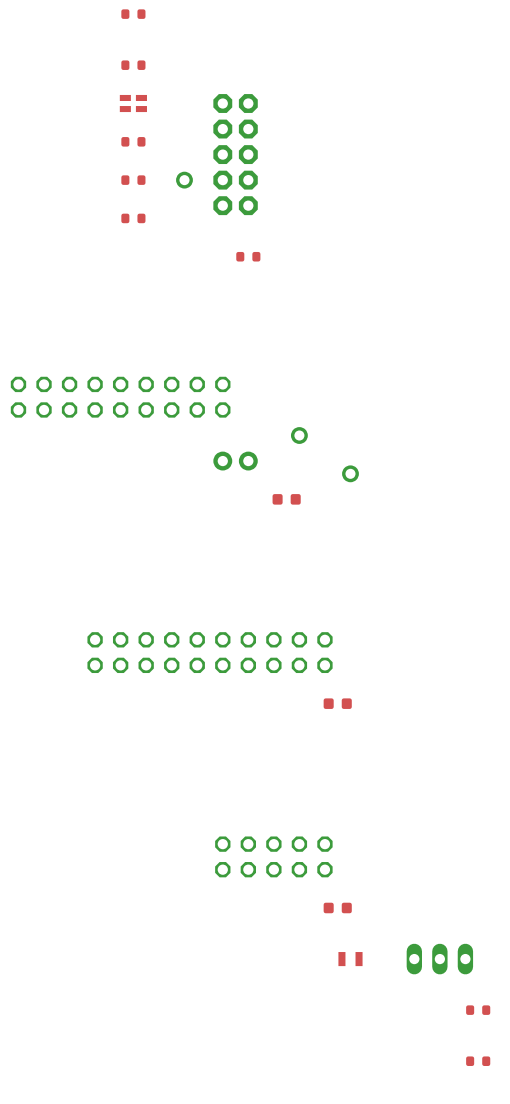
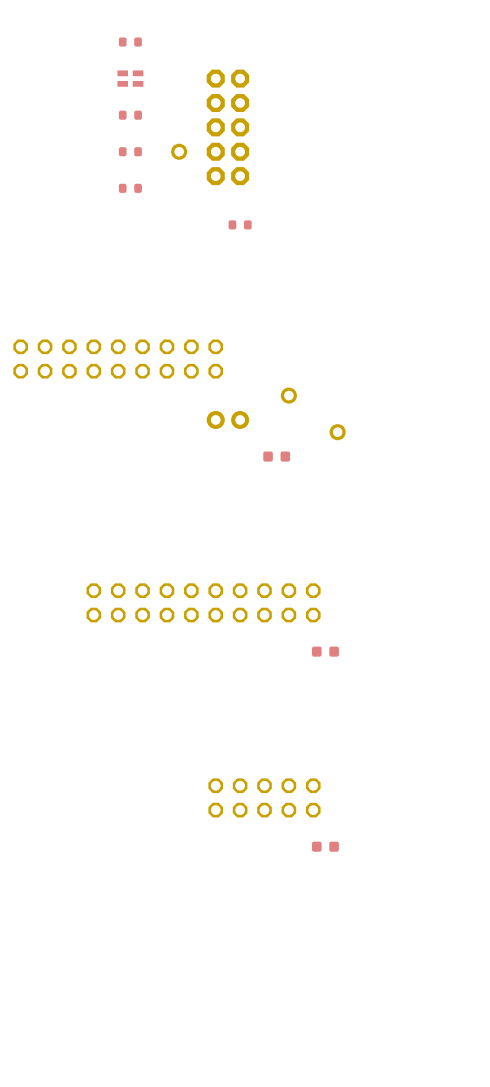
part: (350, 959) -> none
part: (439, 959) -> none
part: (478, 1010) -> none
part: (478, 1061) -> none

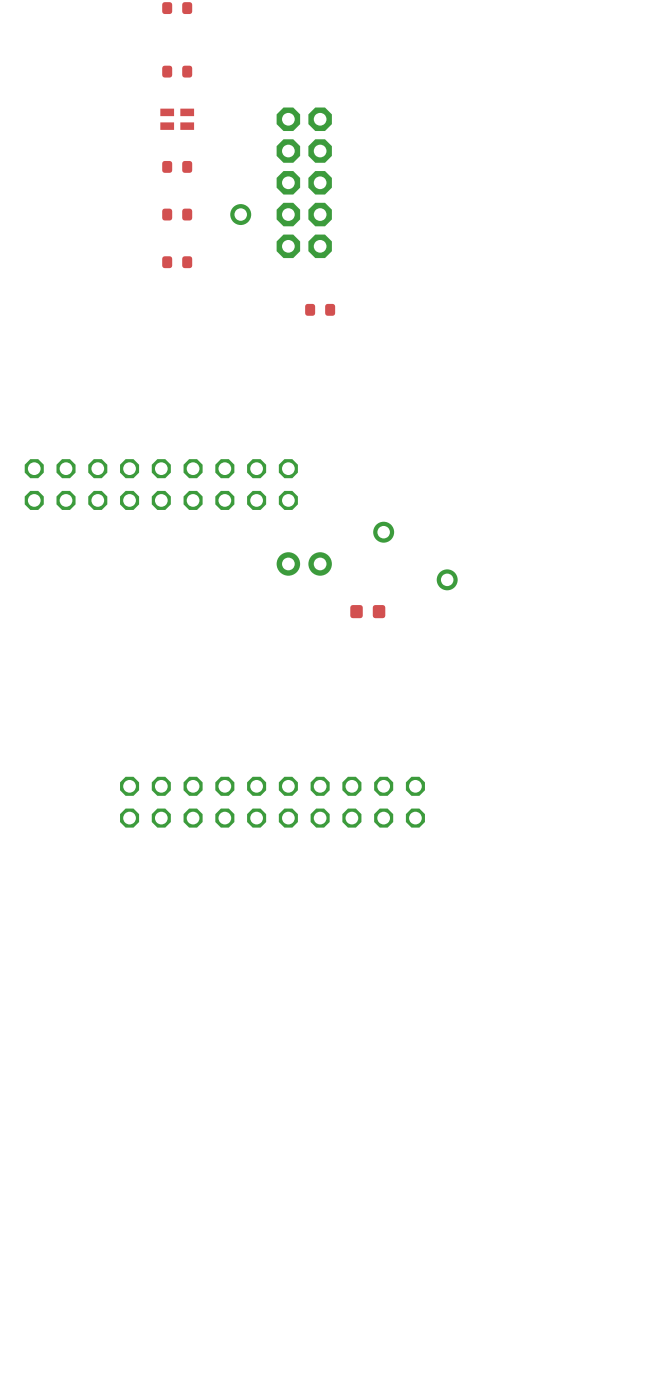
part: (325, 651) -> none
part: (264, 797) -> none
part: (325, 846) -> none

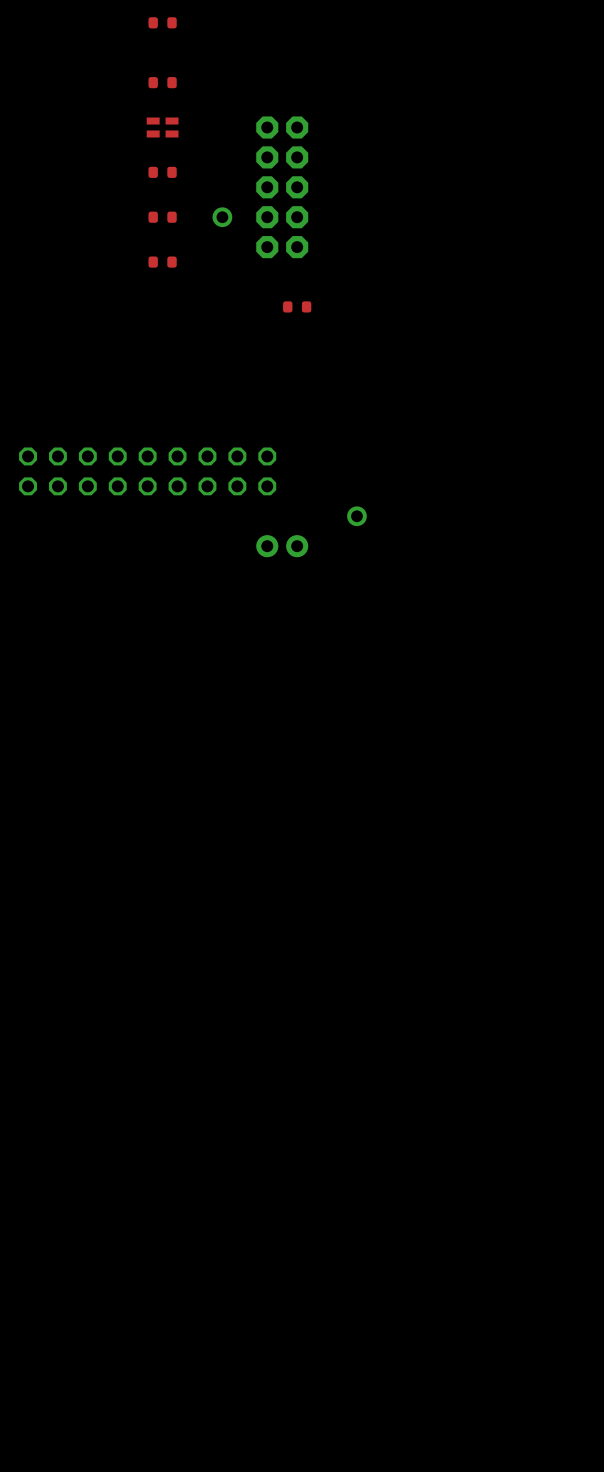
part: (447, 579) -> none
part: (367, 611) -> none
part: (272, 802) -> none

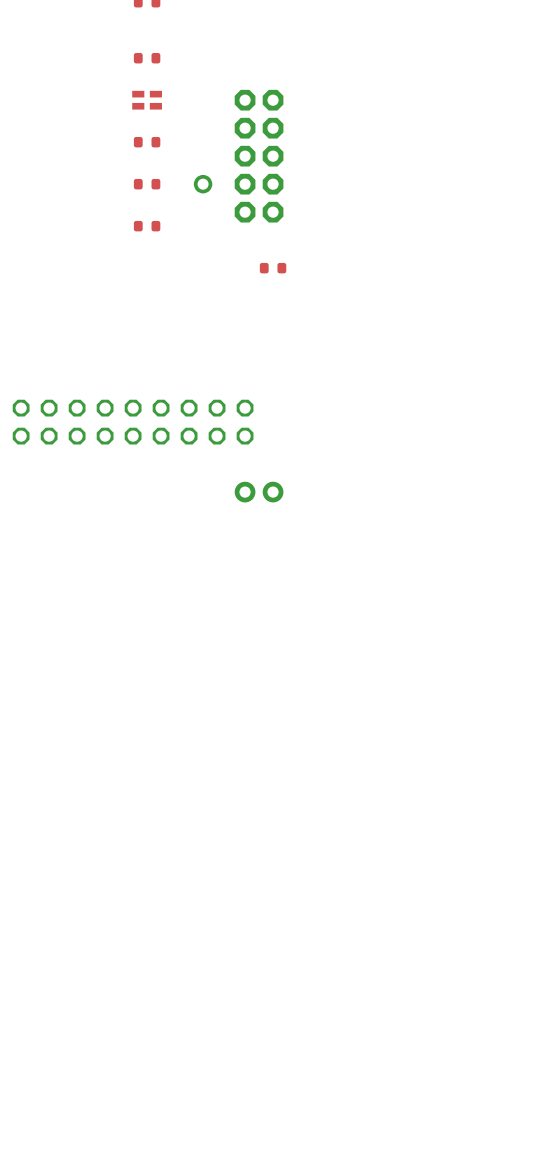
part: (356, 516) -> none

